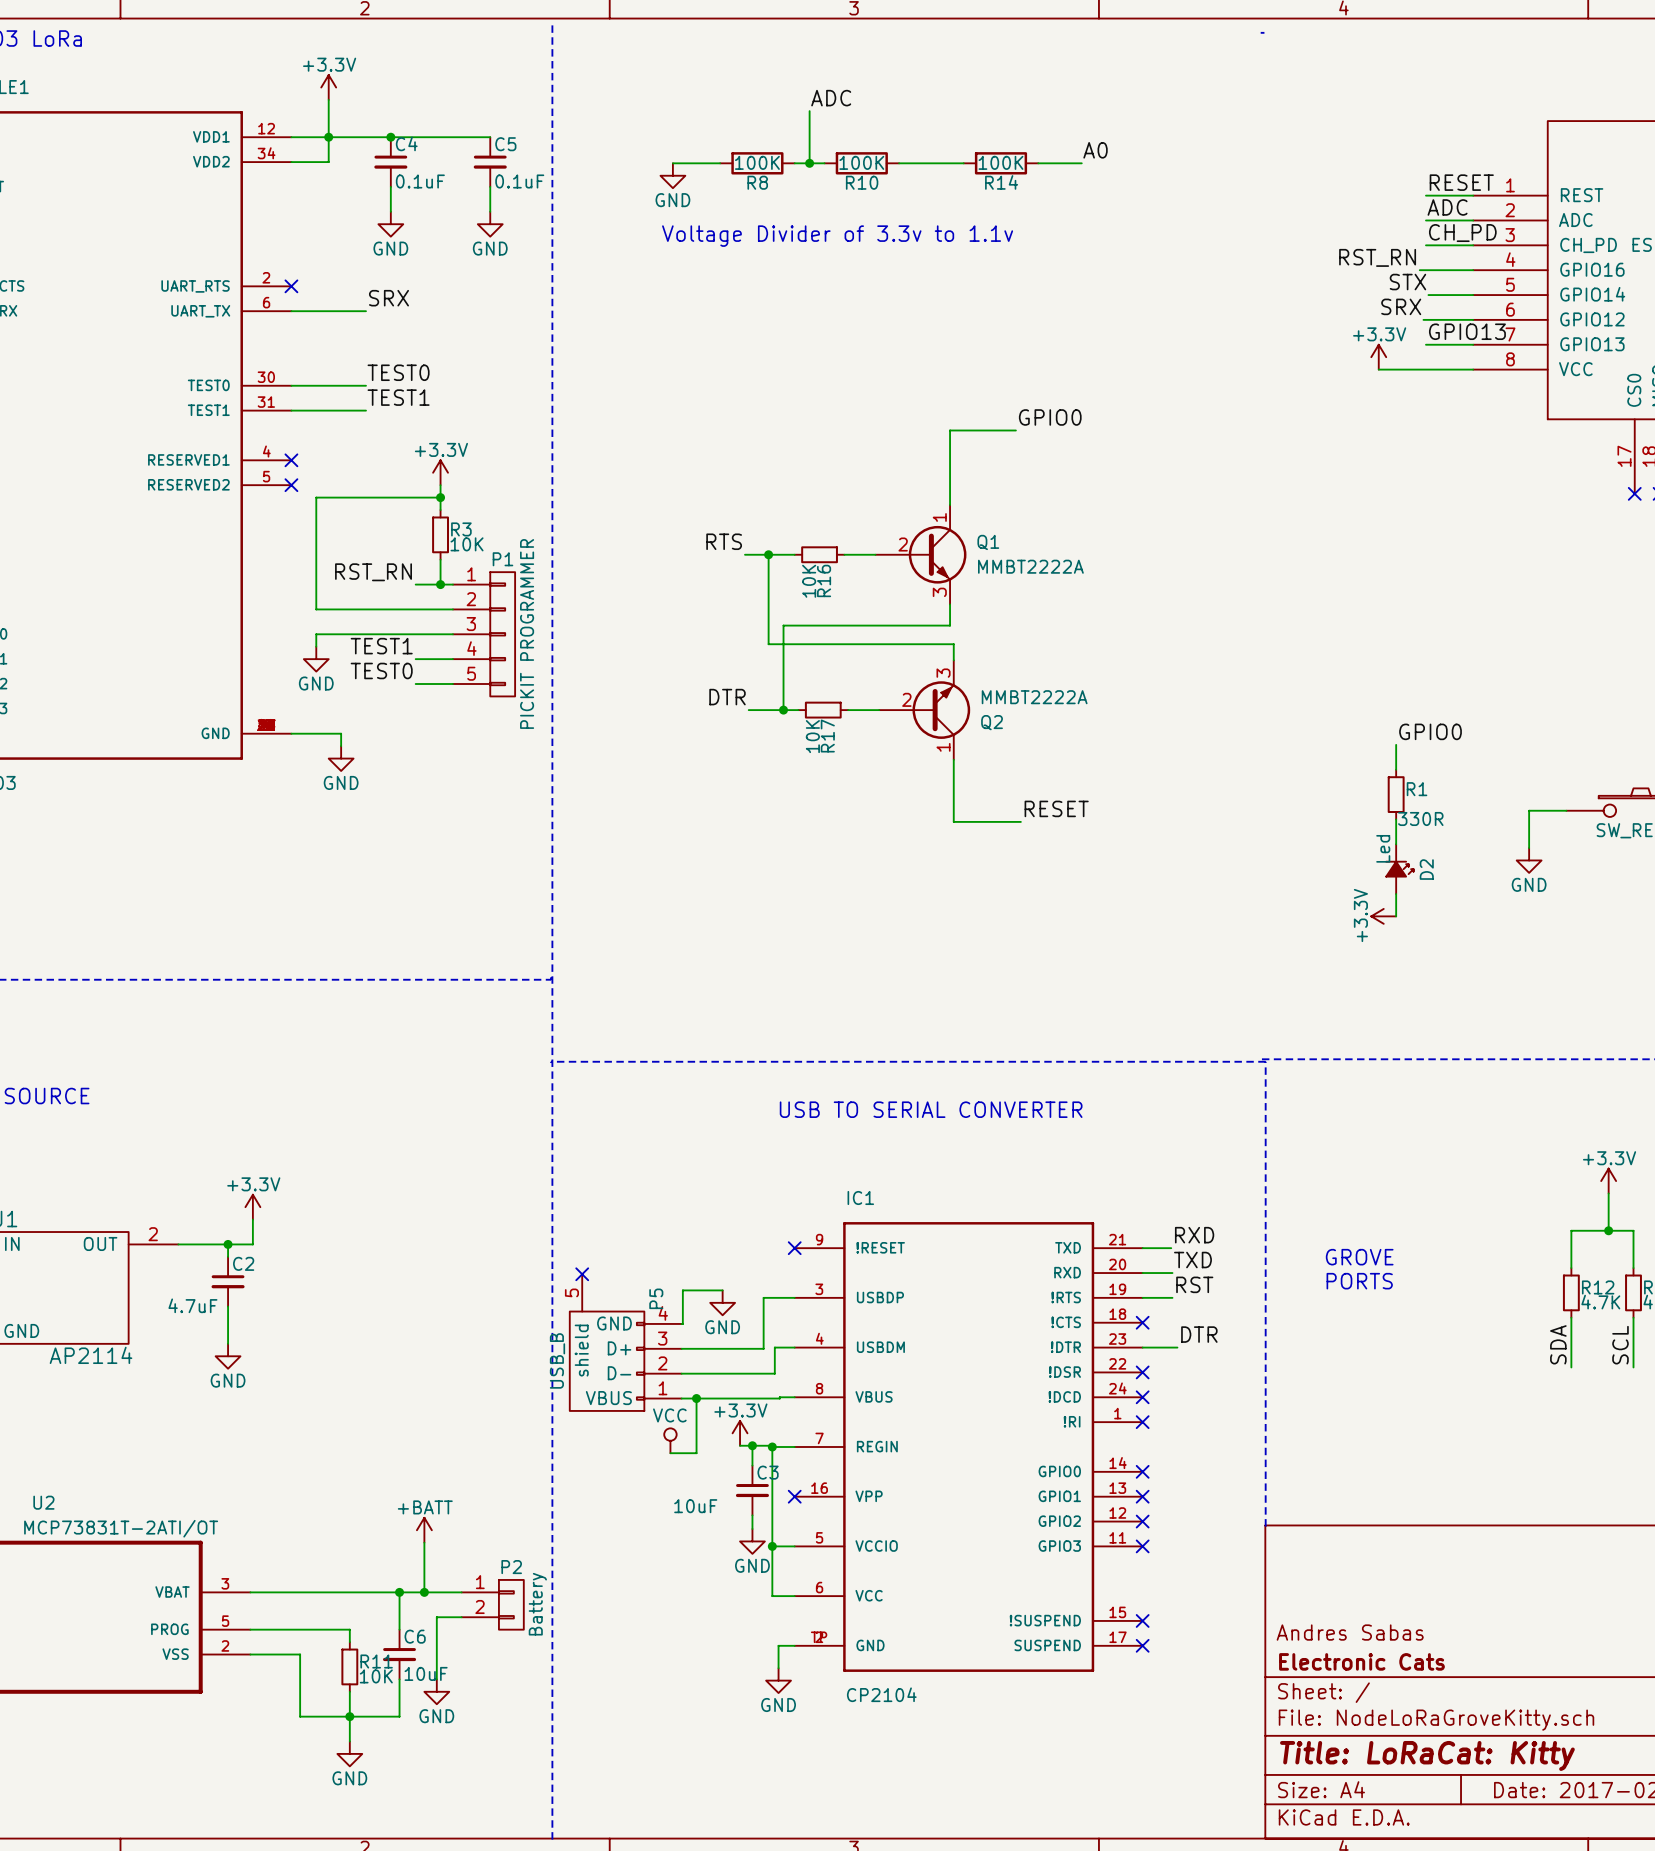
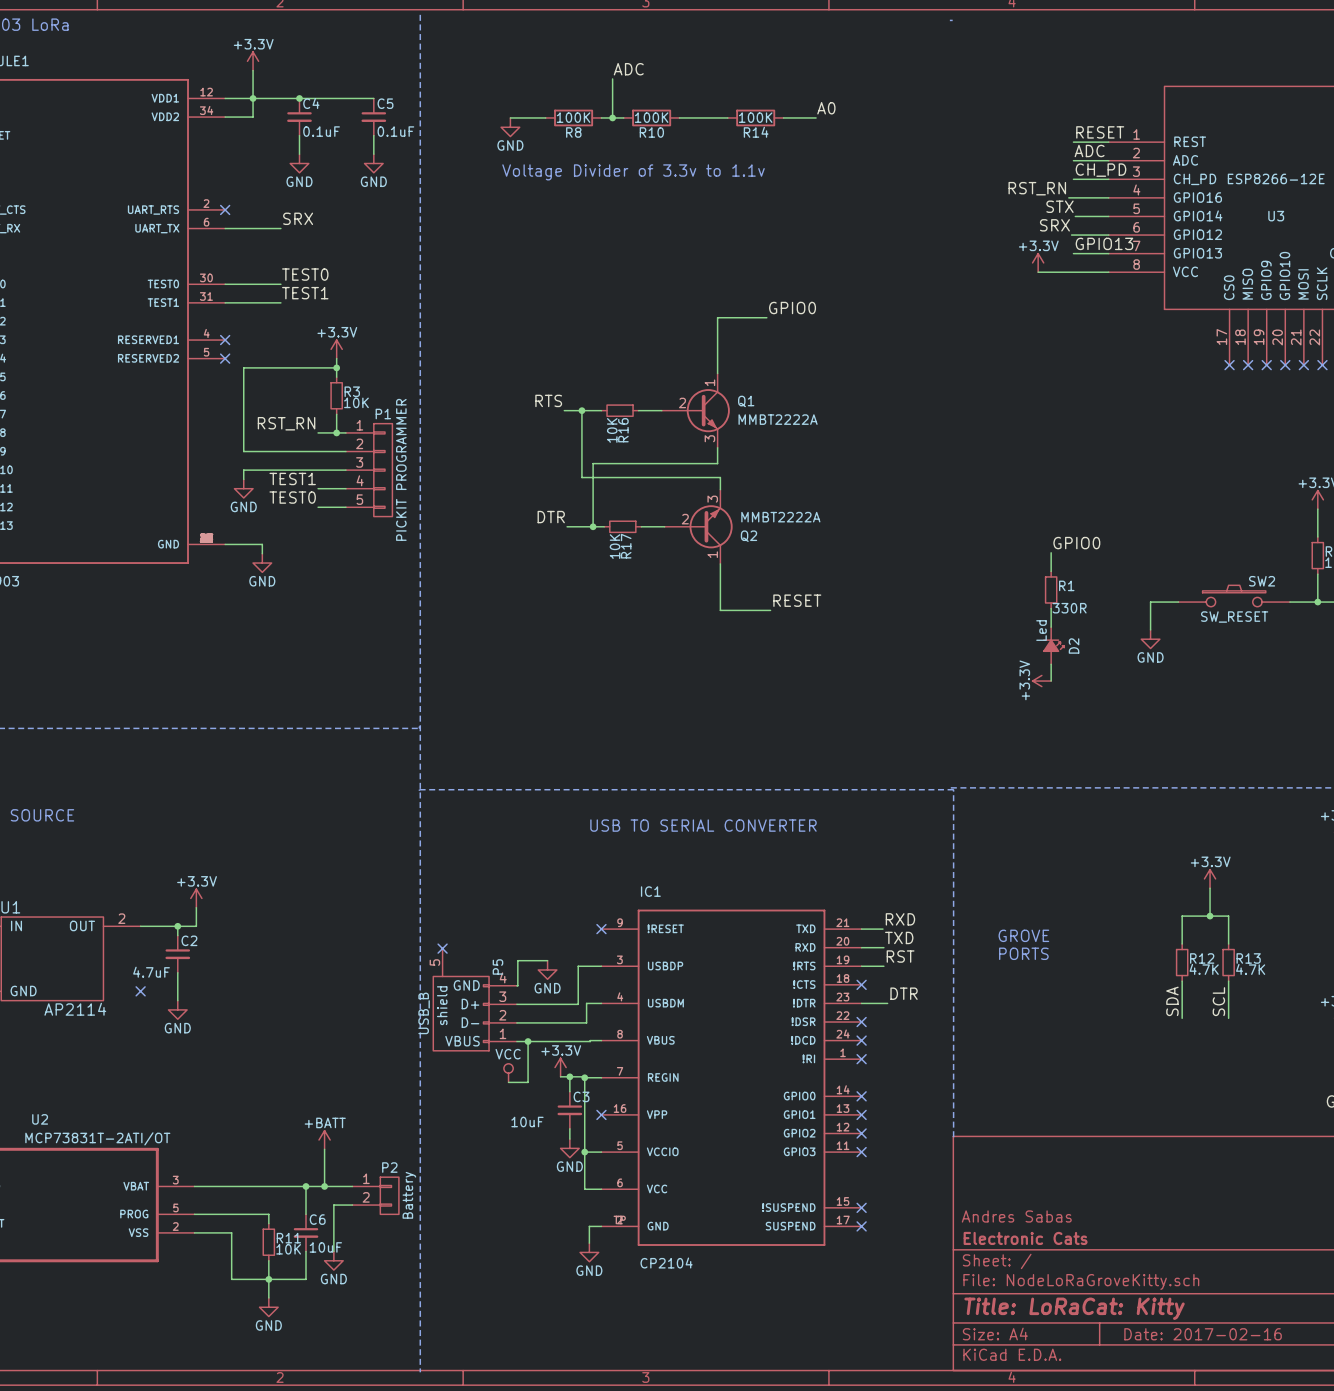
no-connect mark: none -> (140, 991)

